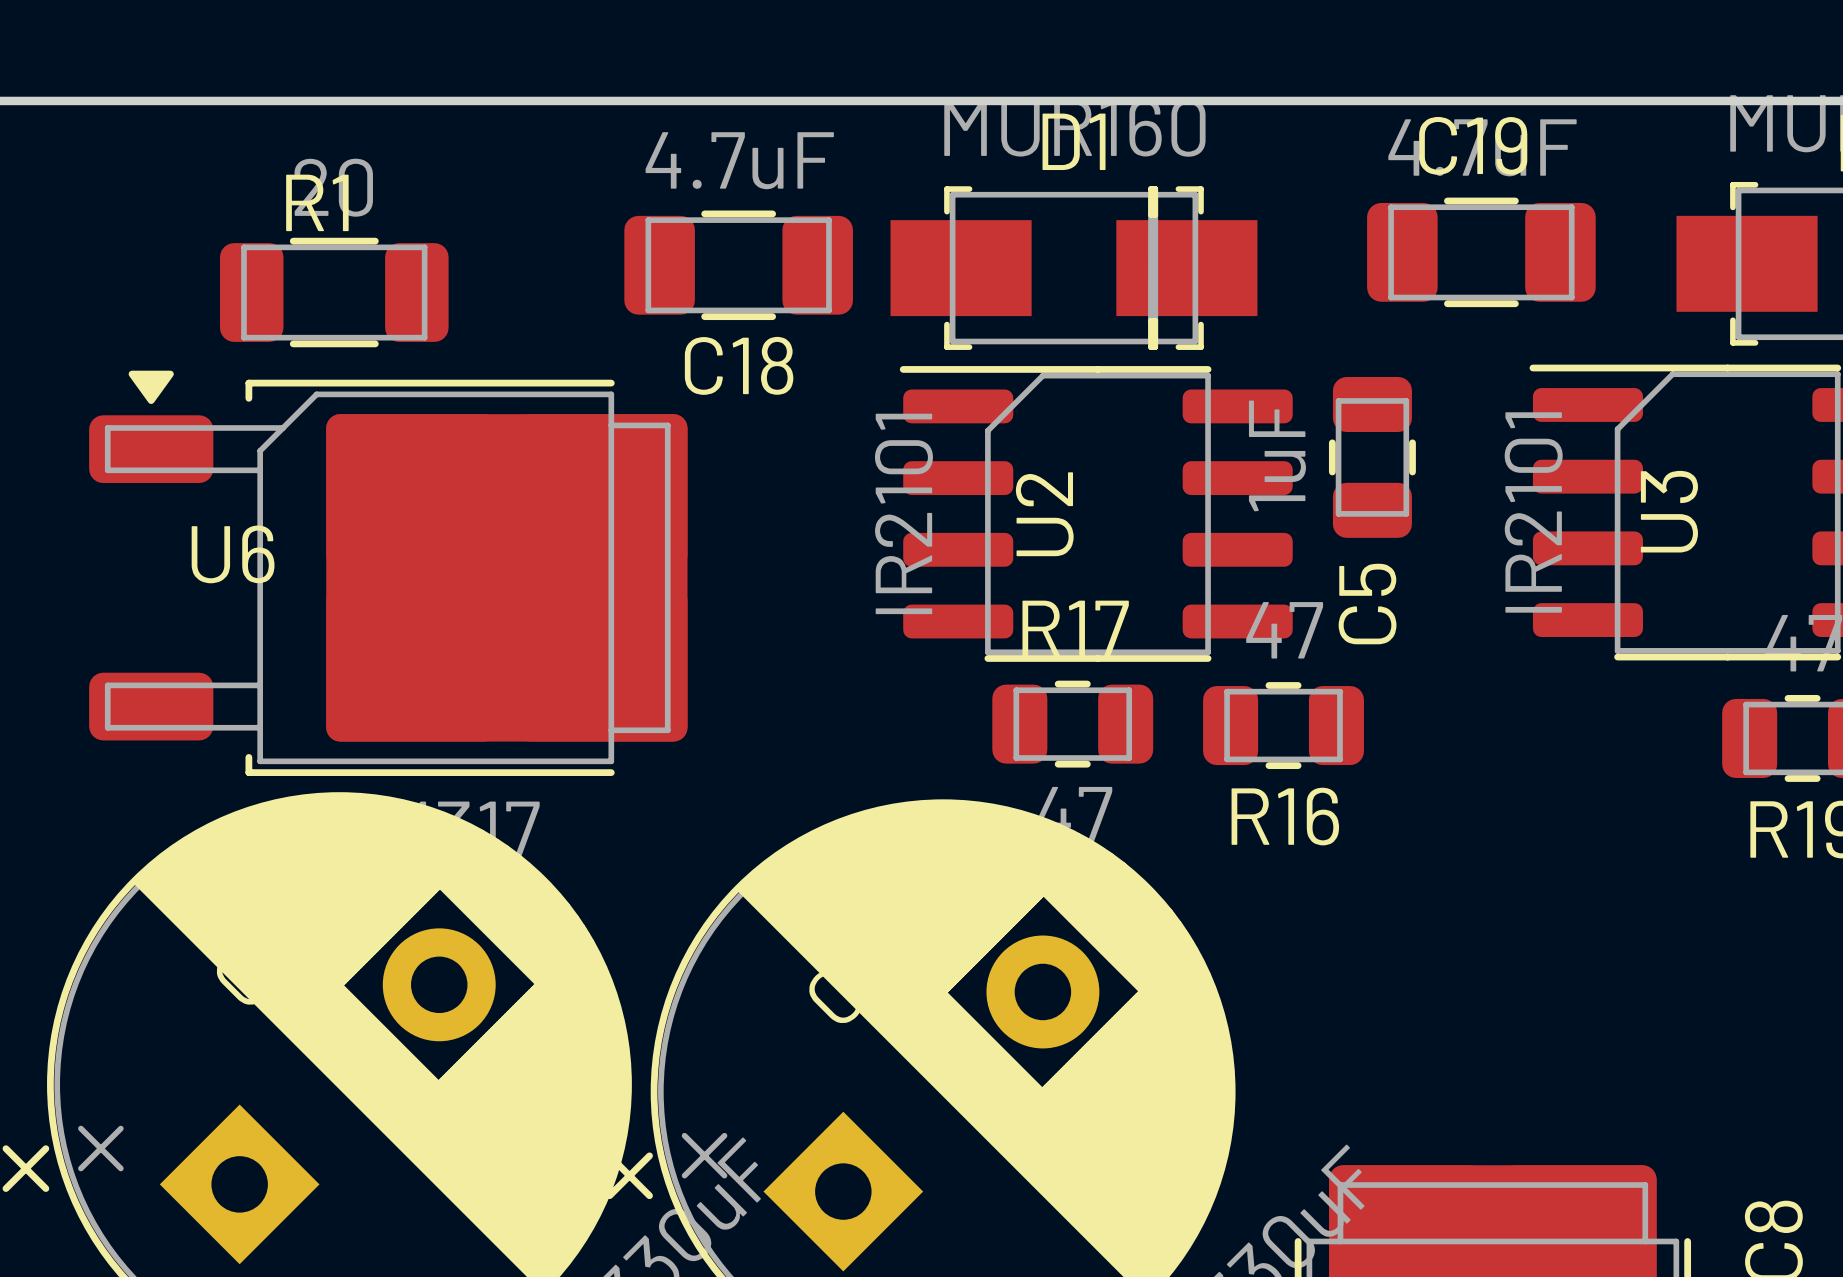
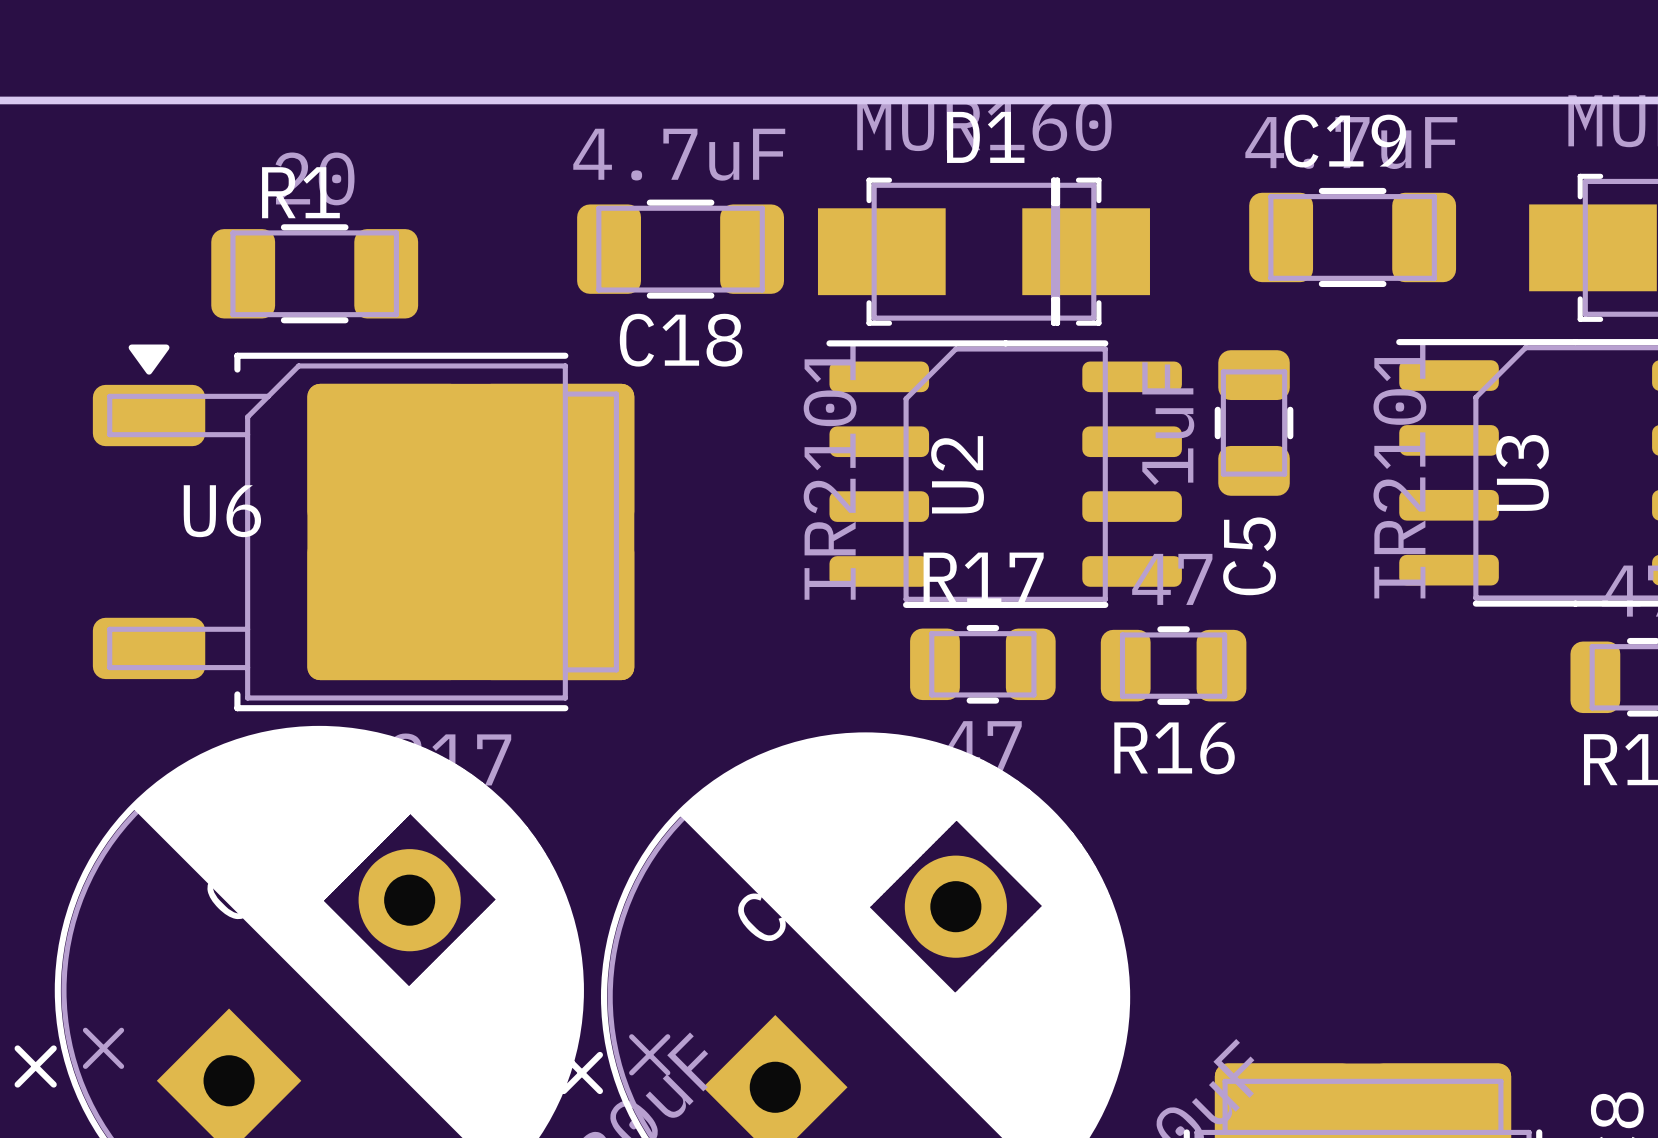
R1 footprint: [219, 237, 449, 348] -> [211, 224, 419, 324]

